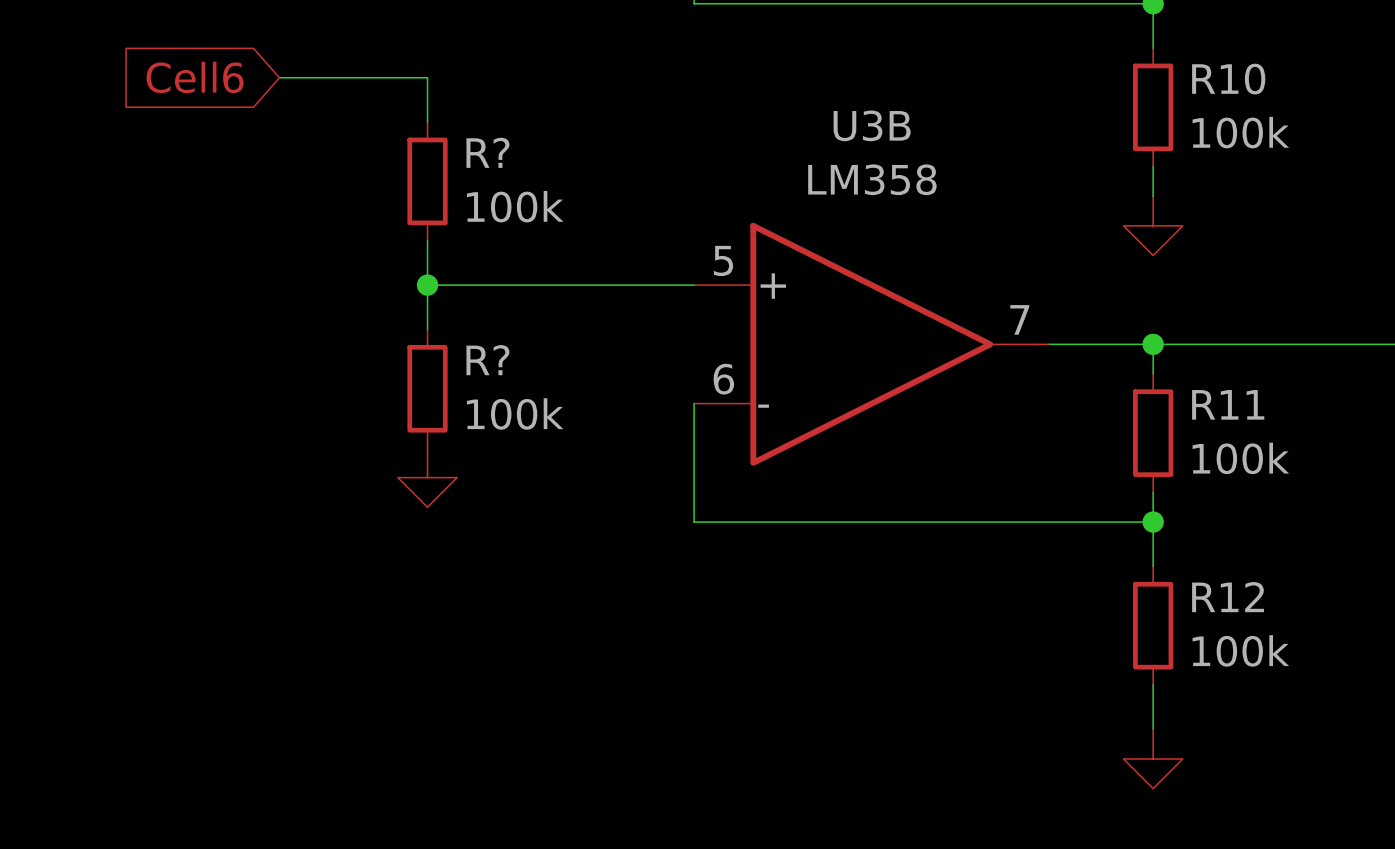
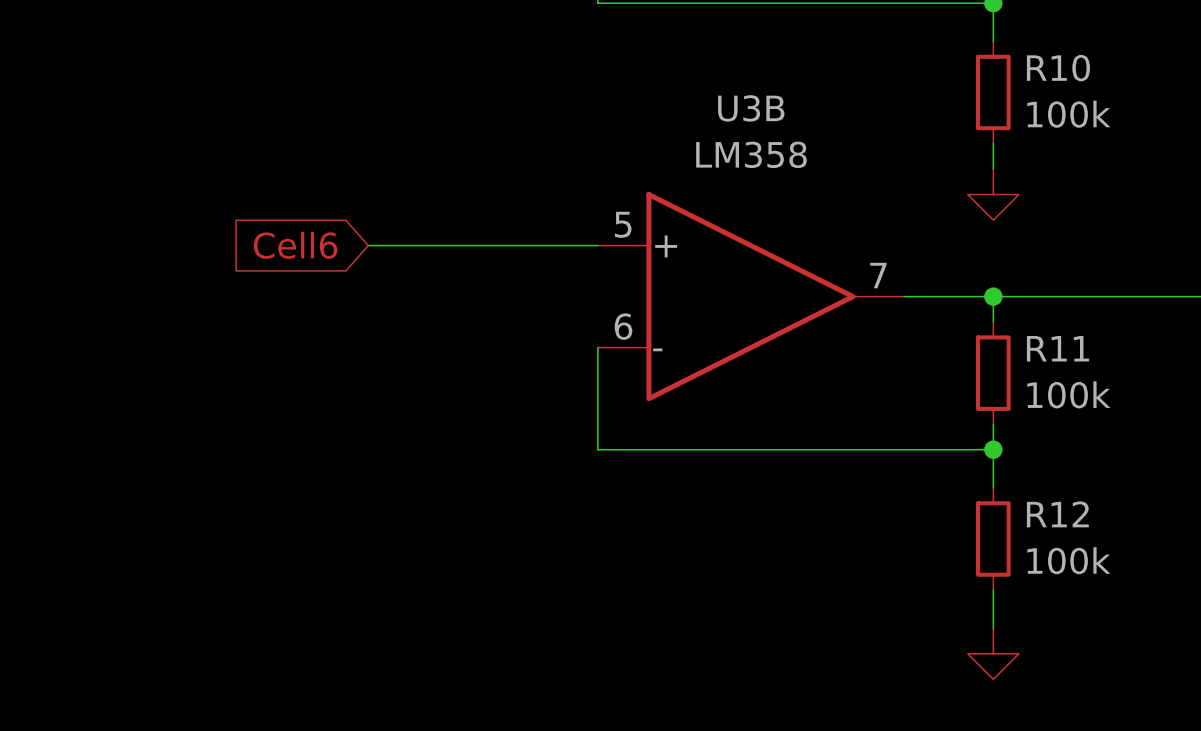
global label position: Cell6 (195, 77) -> Cell6 (295, 245)
wire: (279, 77) (427, 77) (427, 122) -> none
R?: 100k (427, 181) -> none
wire: (427, 240) (427, 329) -> none
junction: (427, 285) -> none
R?: 100k (427, 388) -> none
power symbol: (427, 477) -> none

